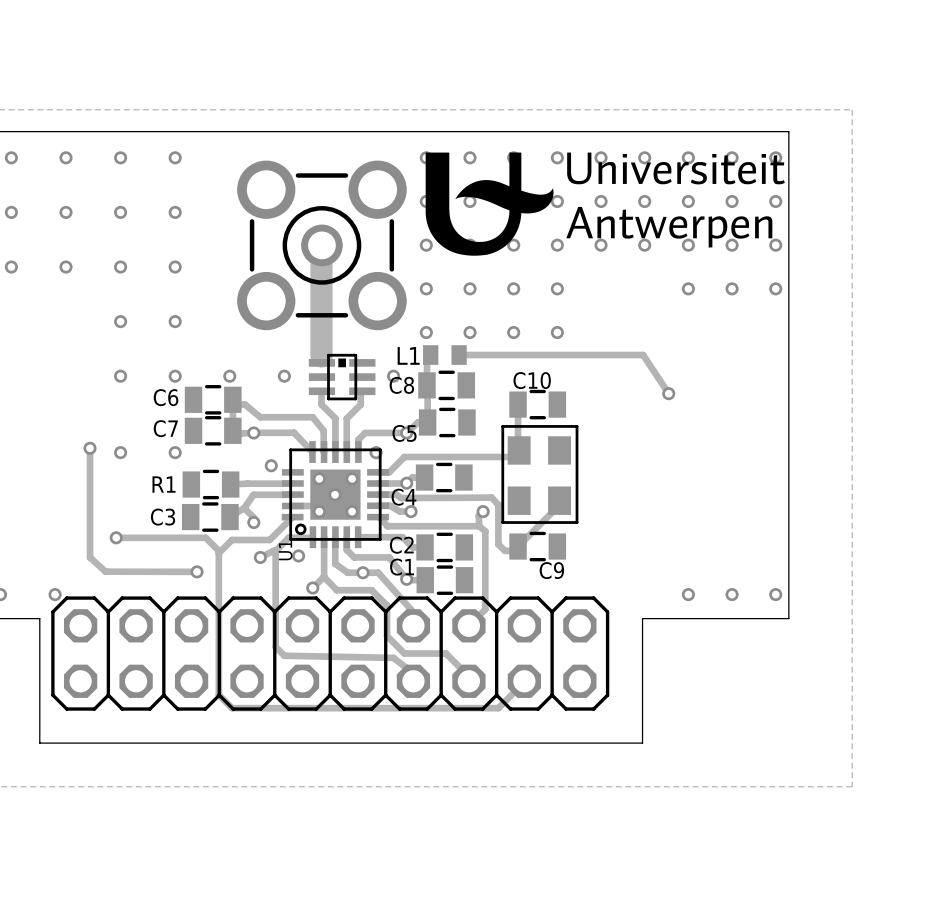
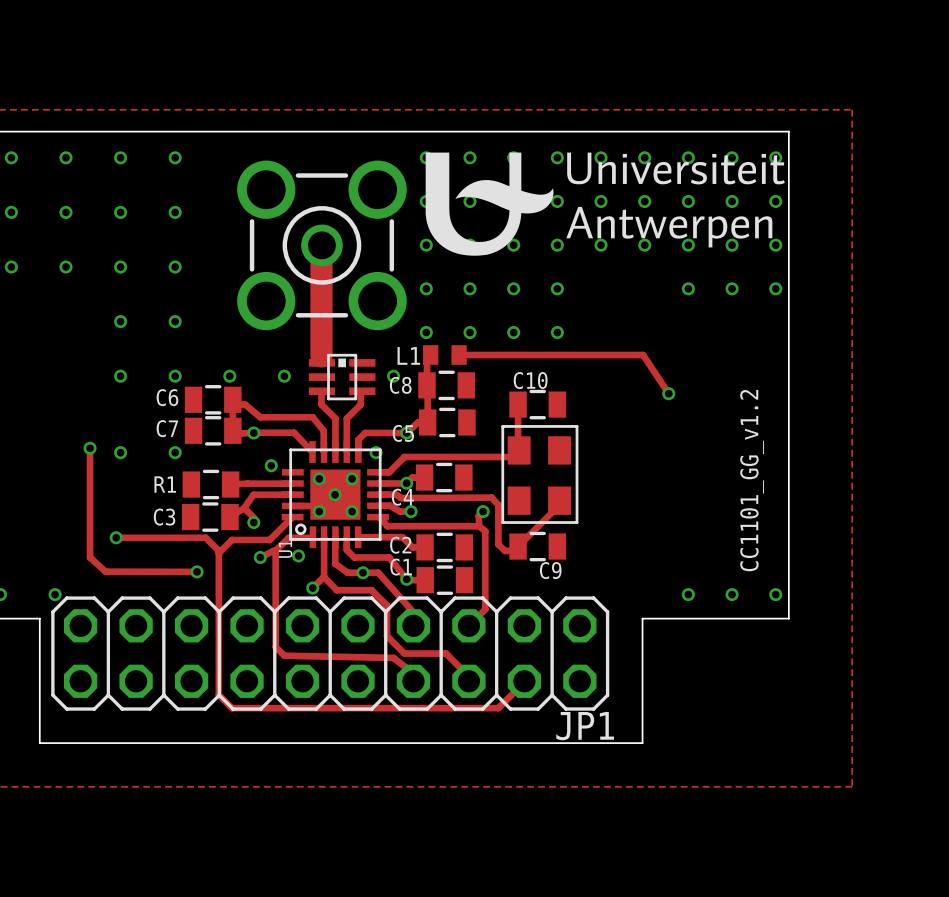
text: none -> CC1101_GG_v1.2 (752, 480)
JP1 name: none -> JP1 (585, 726)

